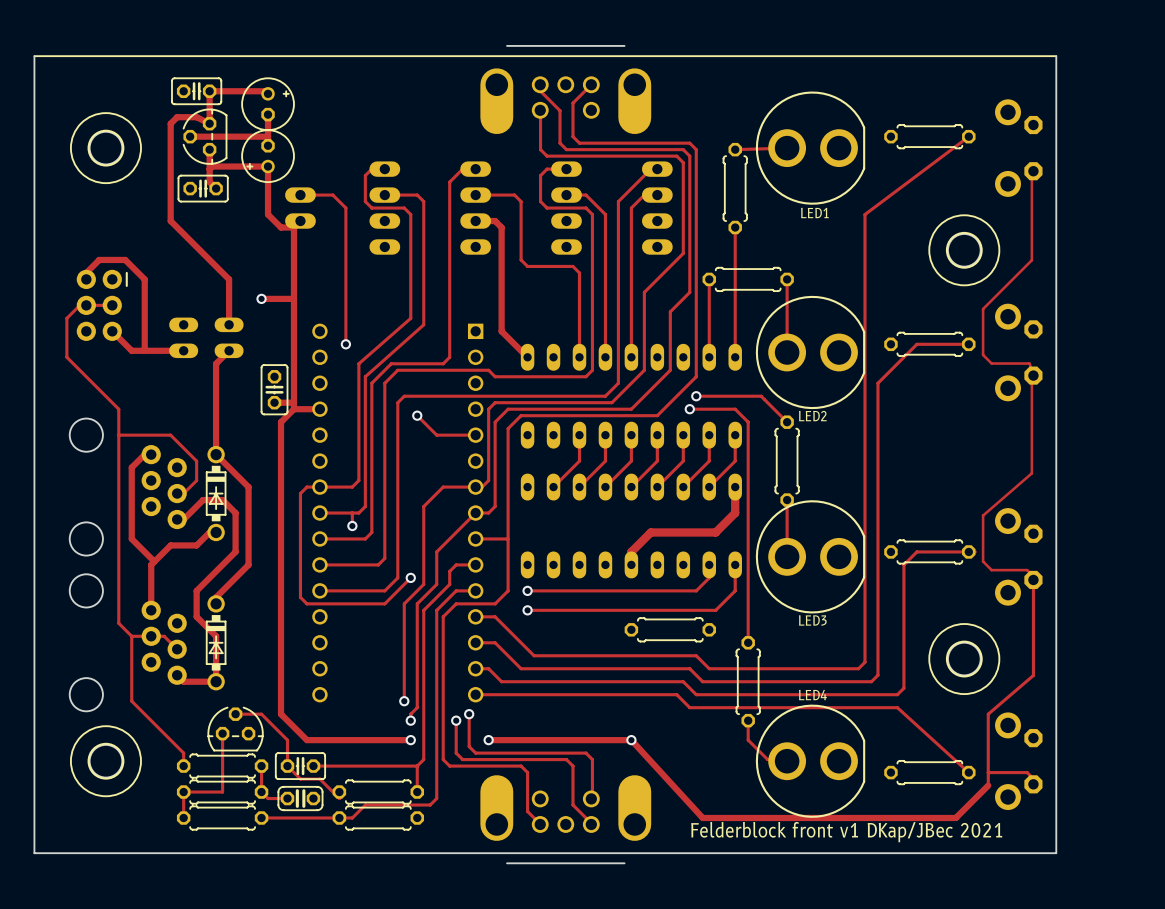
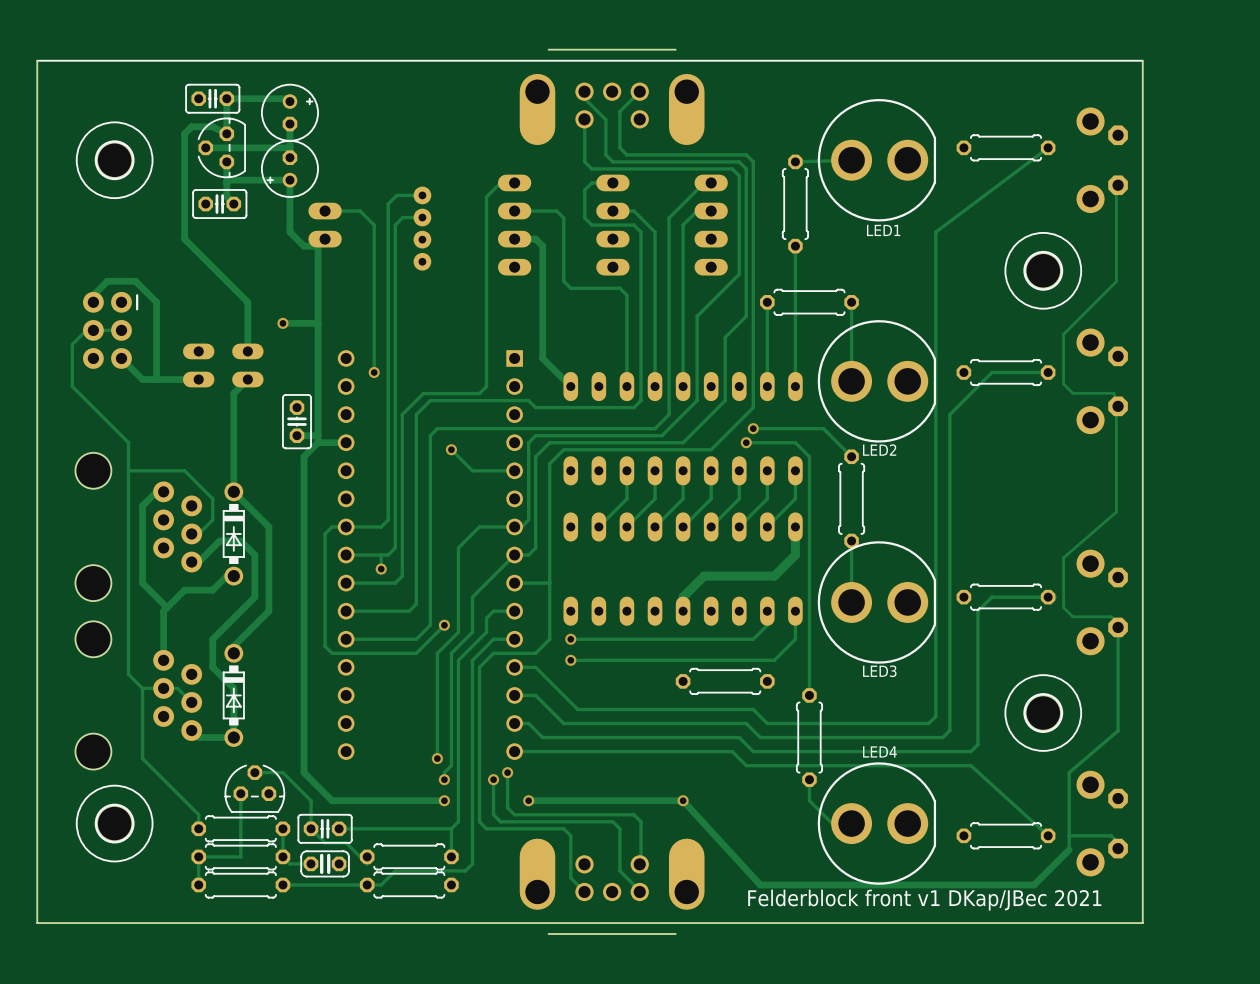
part footprint: [369, 161, 401, 255] -> [413, 186, 432, 271]
track: (384, 169) (371, 169) (365, 175) (365, 201) (371, 208) (404, 208) (410, 214) (410, 318) (358, 363) -> (422, 195) (396, 195) (388, 204) (388, 393)
track: (384, 195) (417, 195) (423, 201) (423, 324) (365, 376) (365, 506) -> (422, 217) (402, 217) (395, 225) (395, 548)

